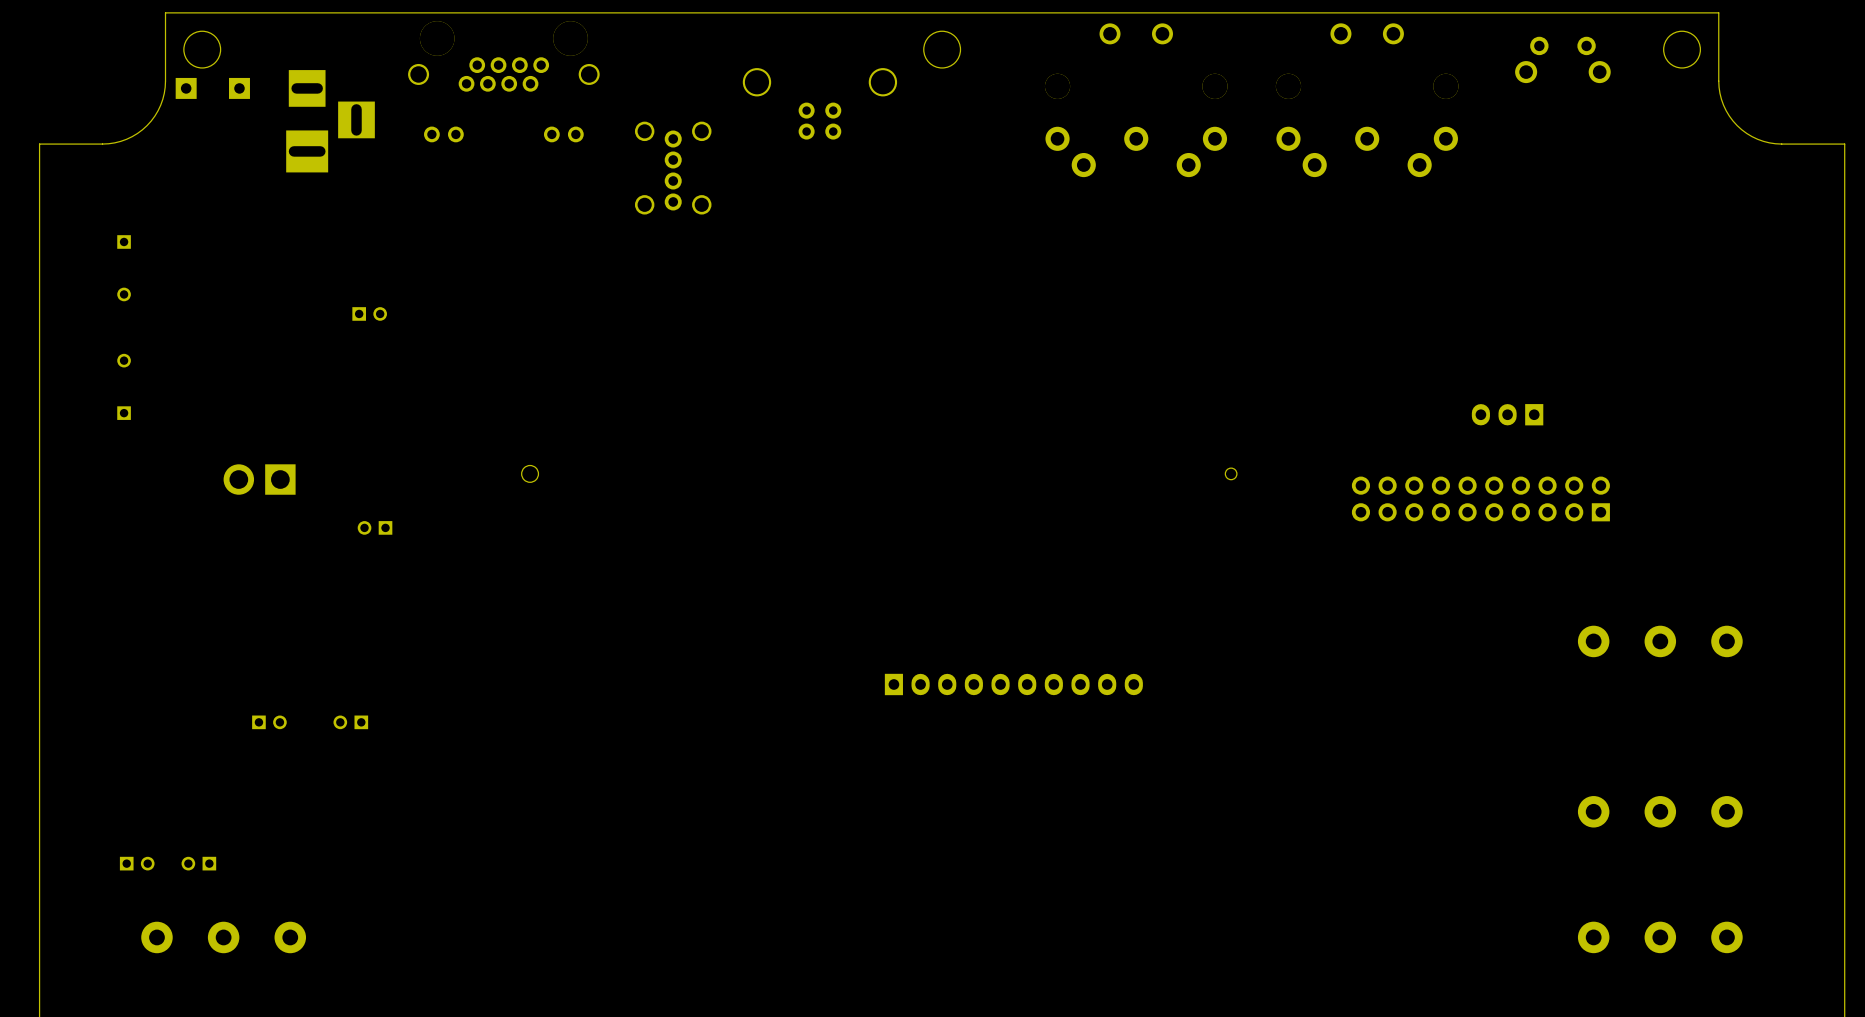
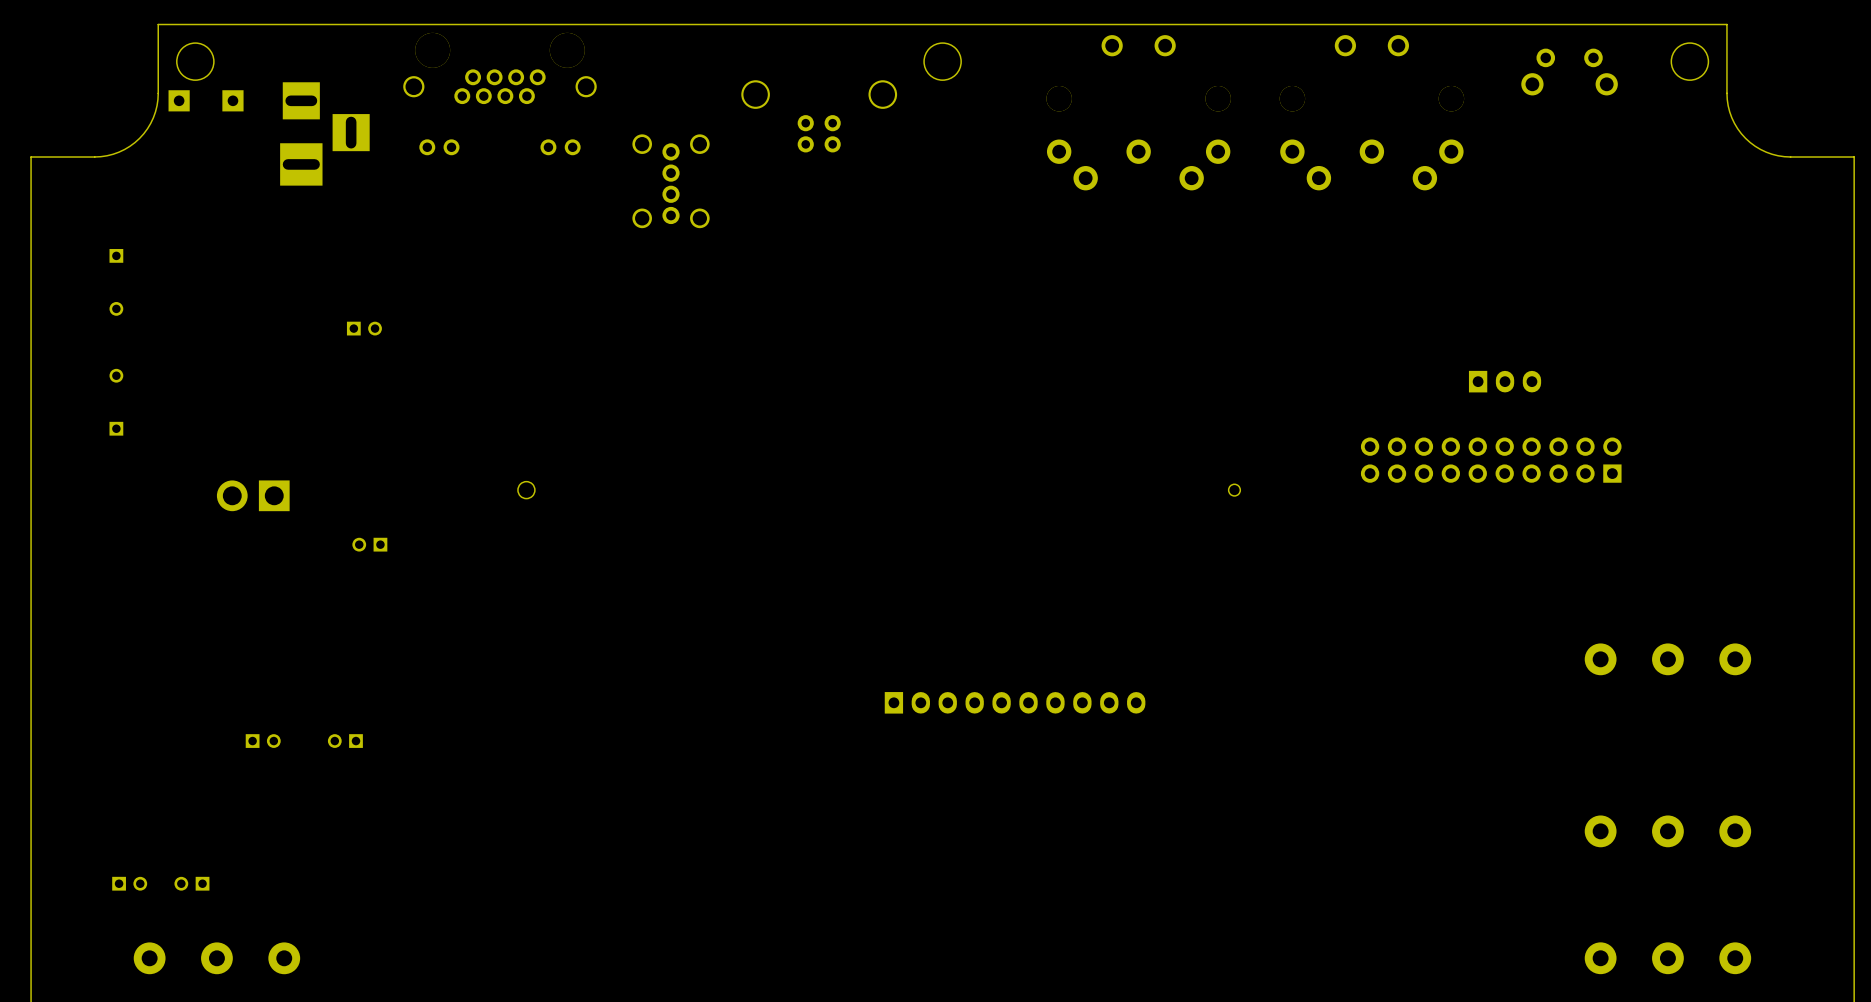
part rotation: 0° (1507, 414) -> 180° (1505, 381)
part position: (1507, 414) -> (1505, 381)
part position: (1480, 498) -> (1491, 460)

